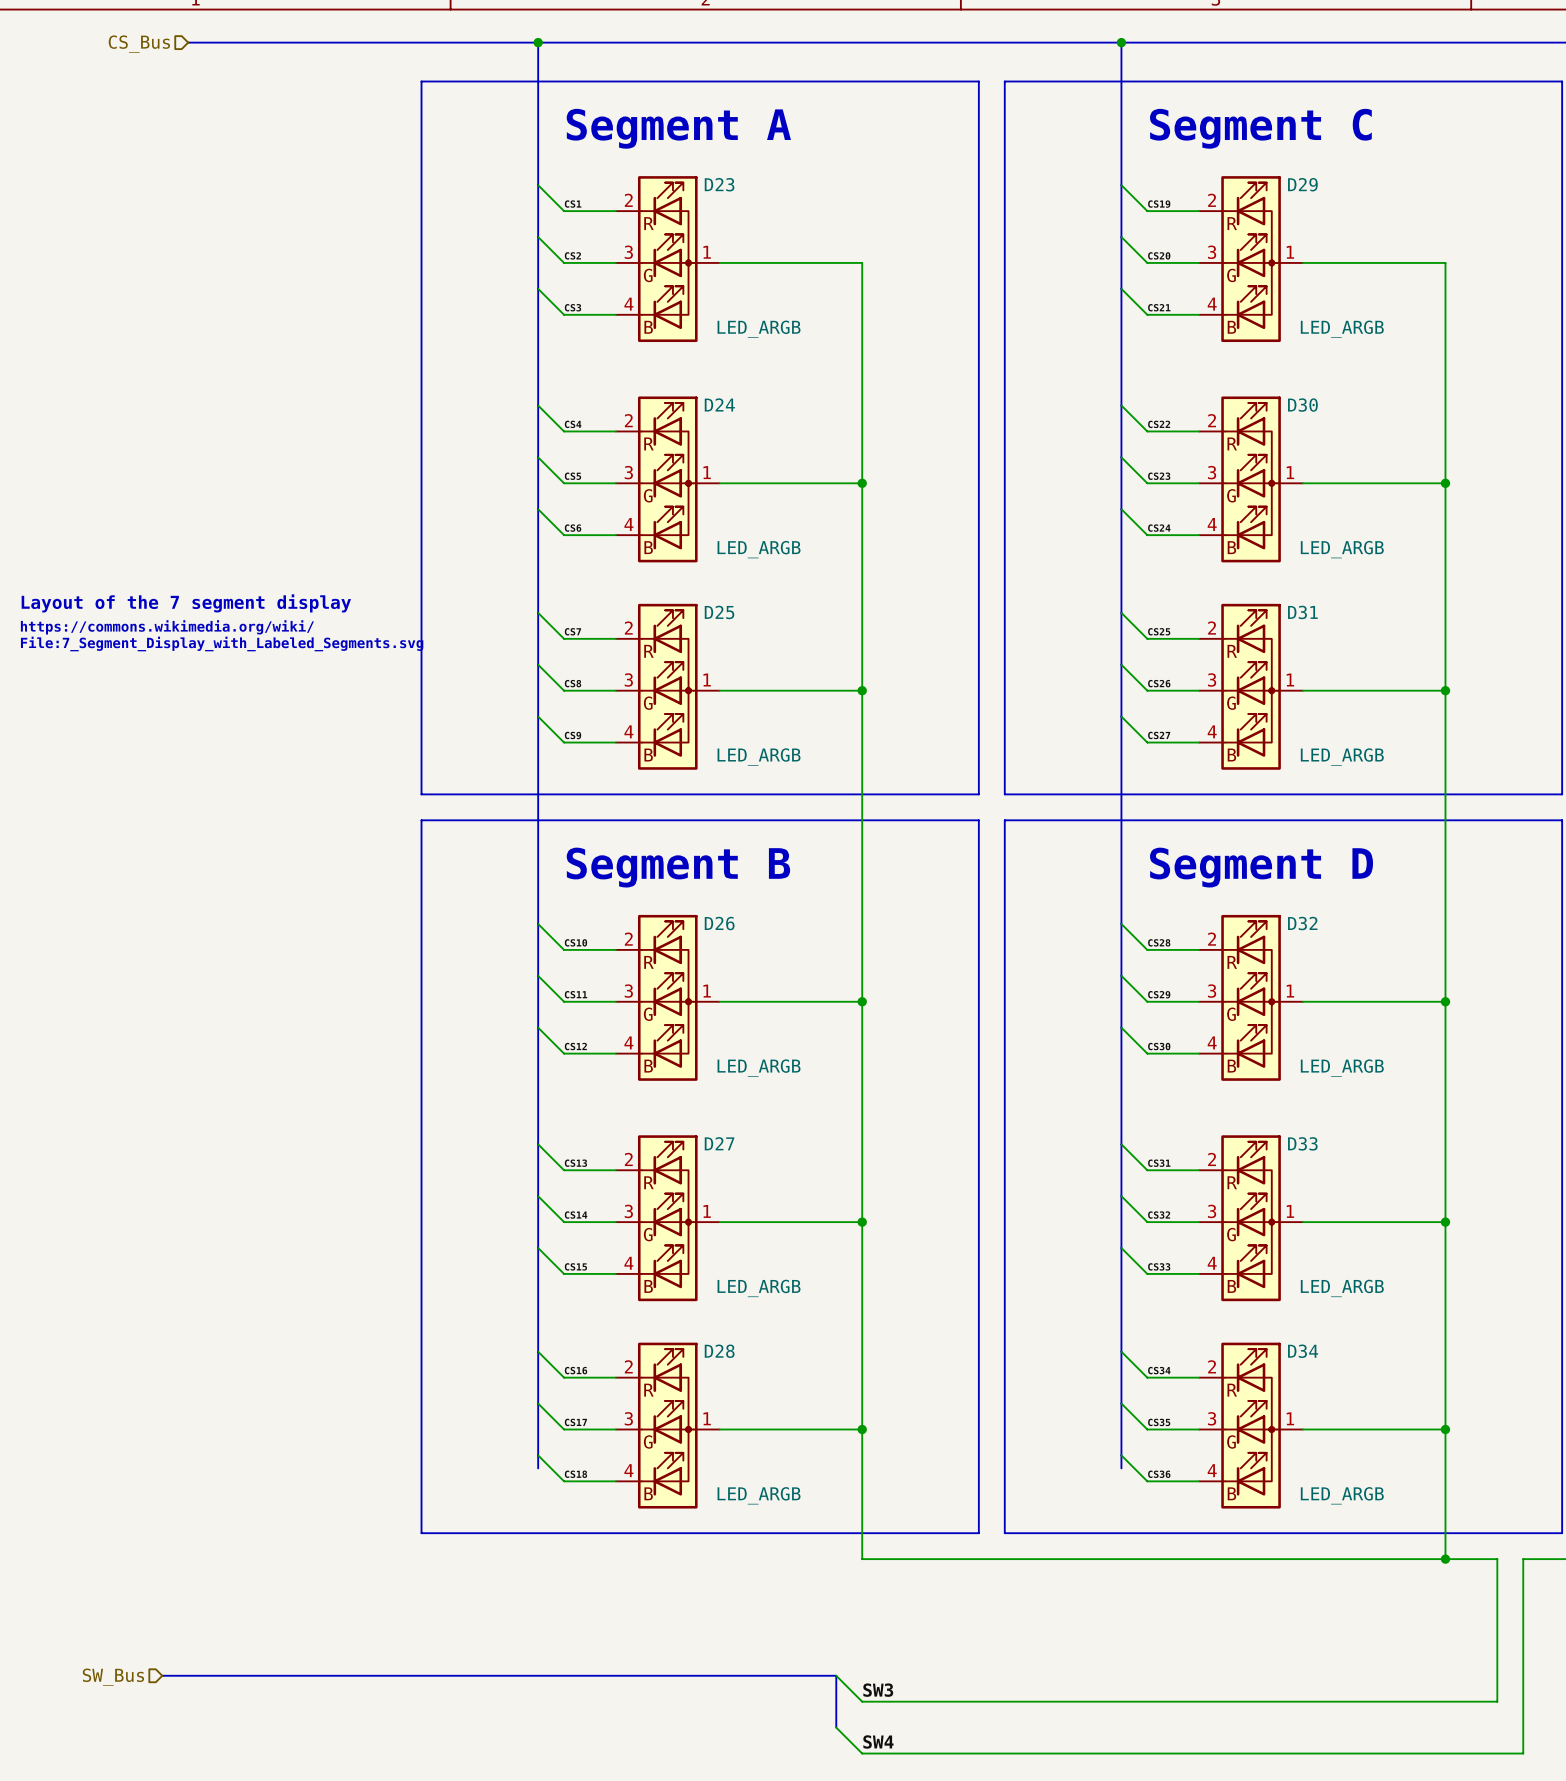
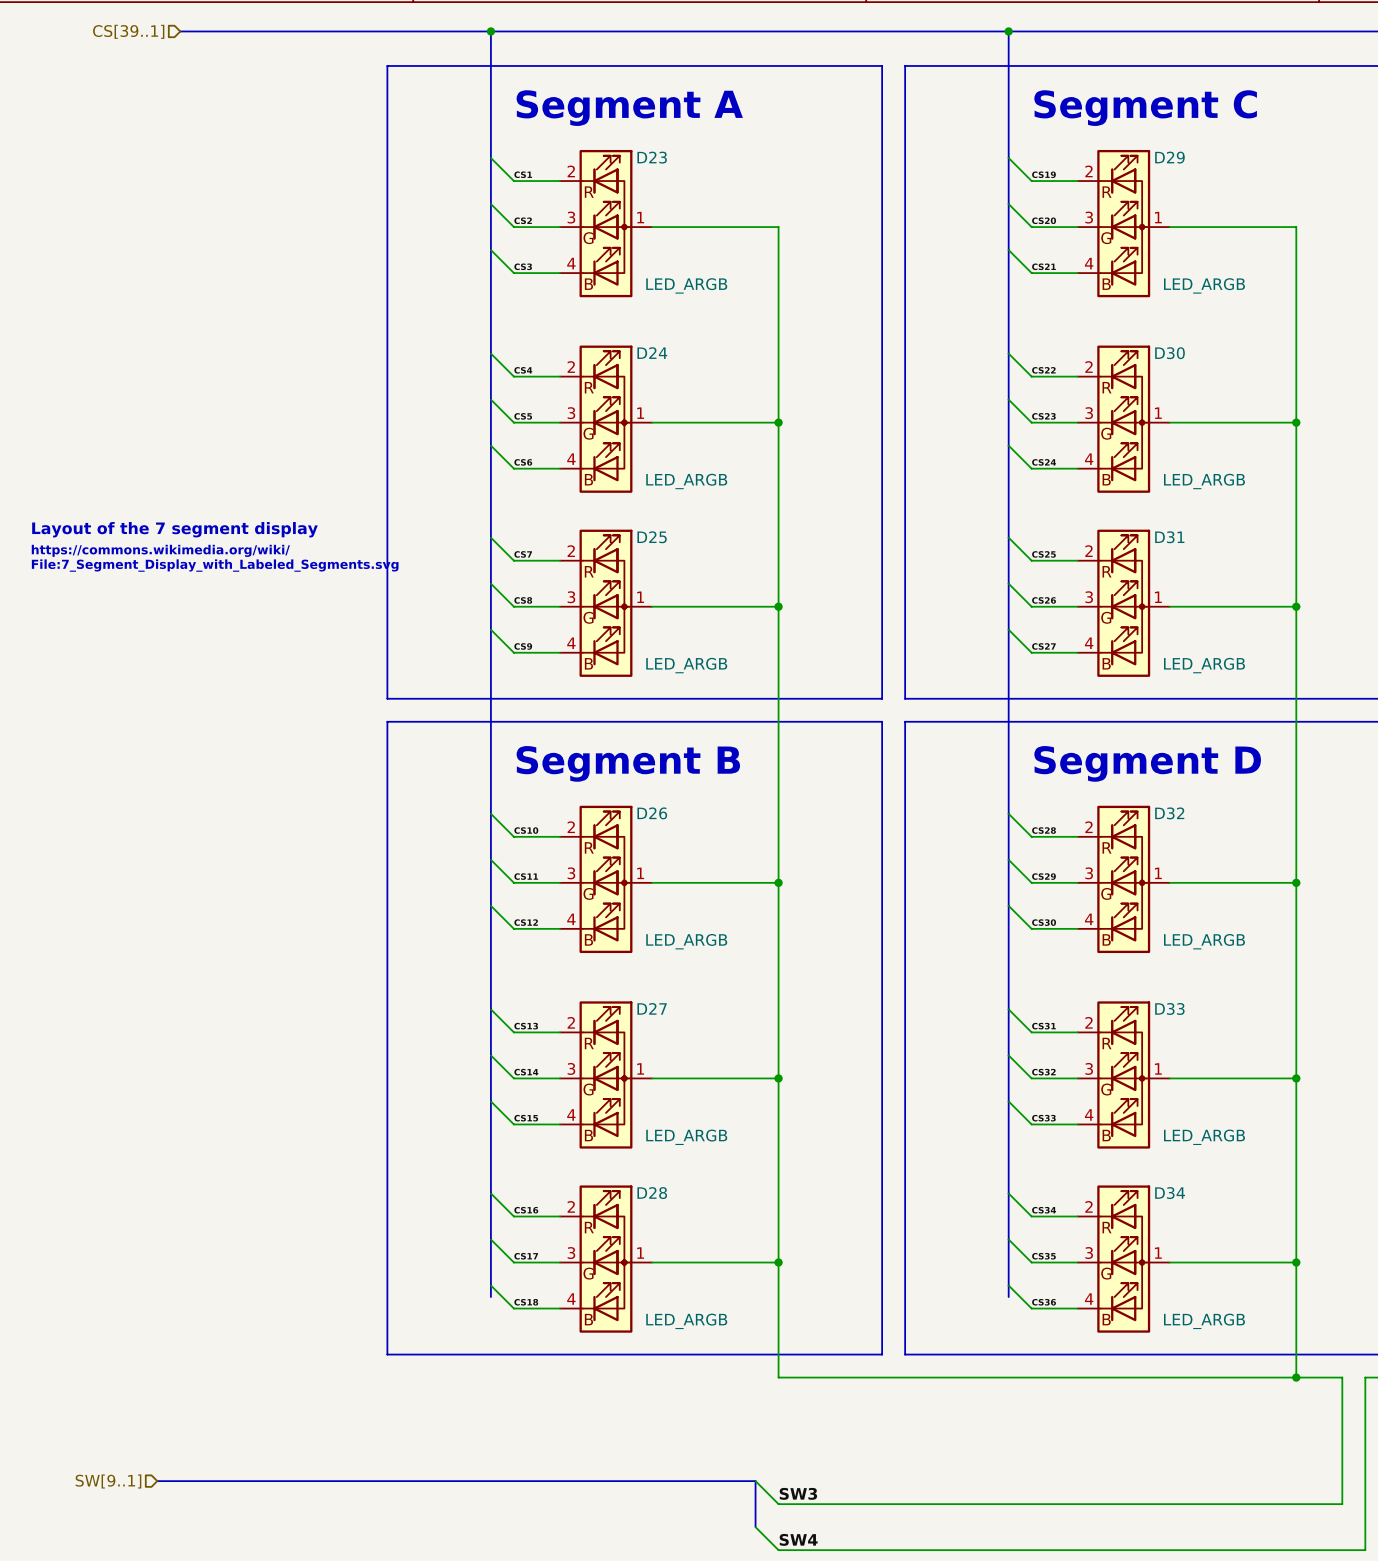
hierarchical label: CS_Bus (139, 44) -> CS[39..1] (128, 31)
hierarchical label: SW_Bus (113, 1677) -> SW[9..1] (108, 1481)

